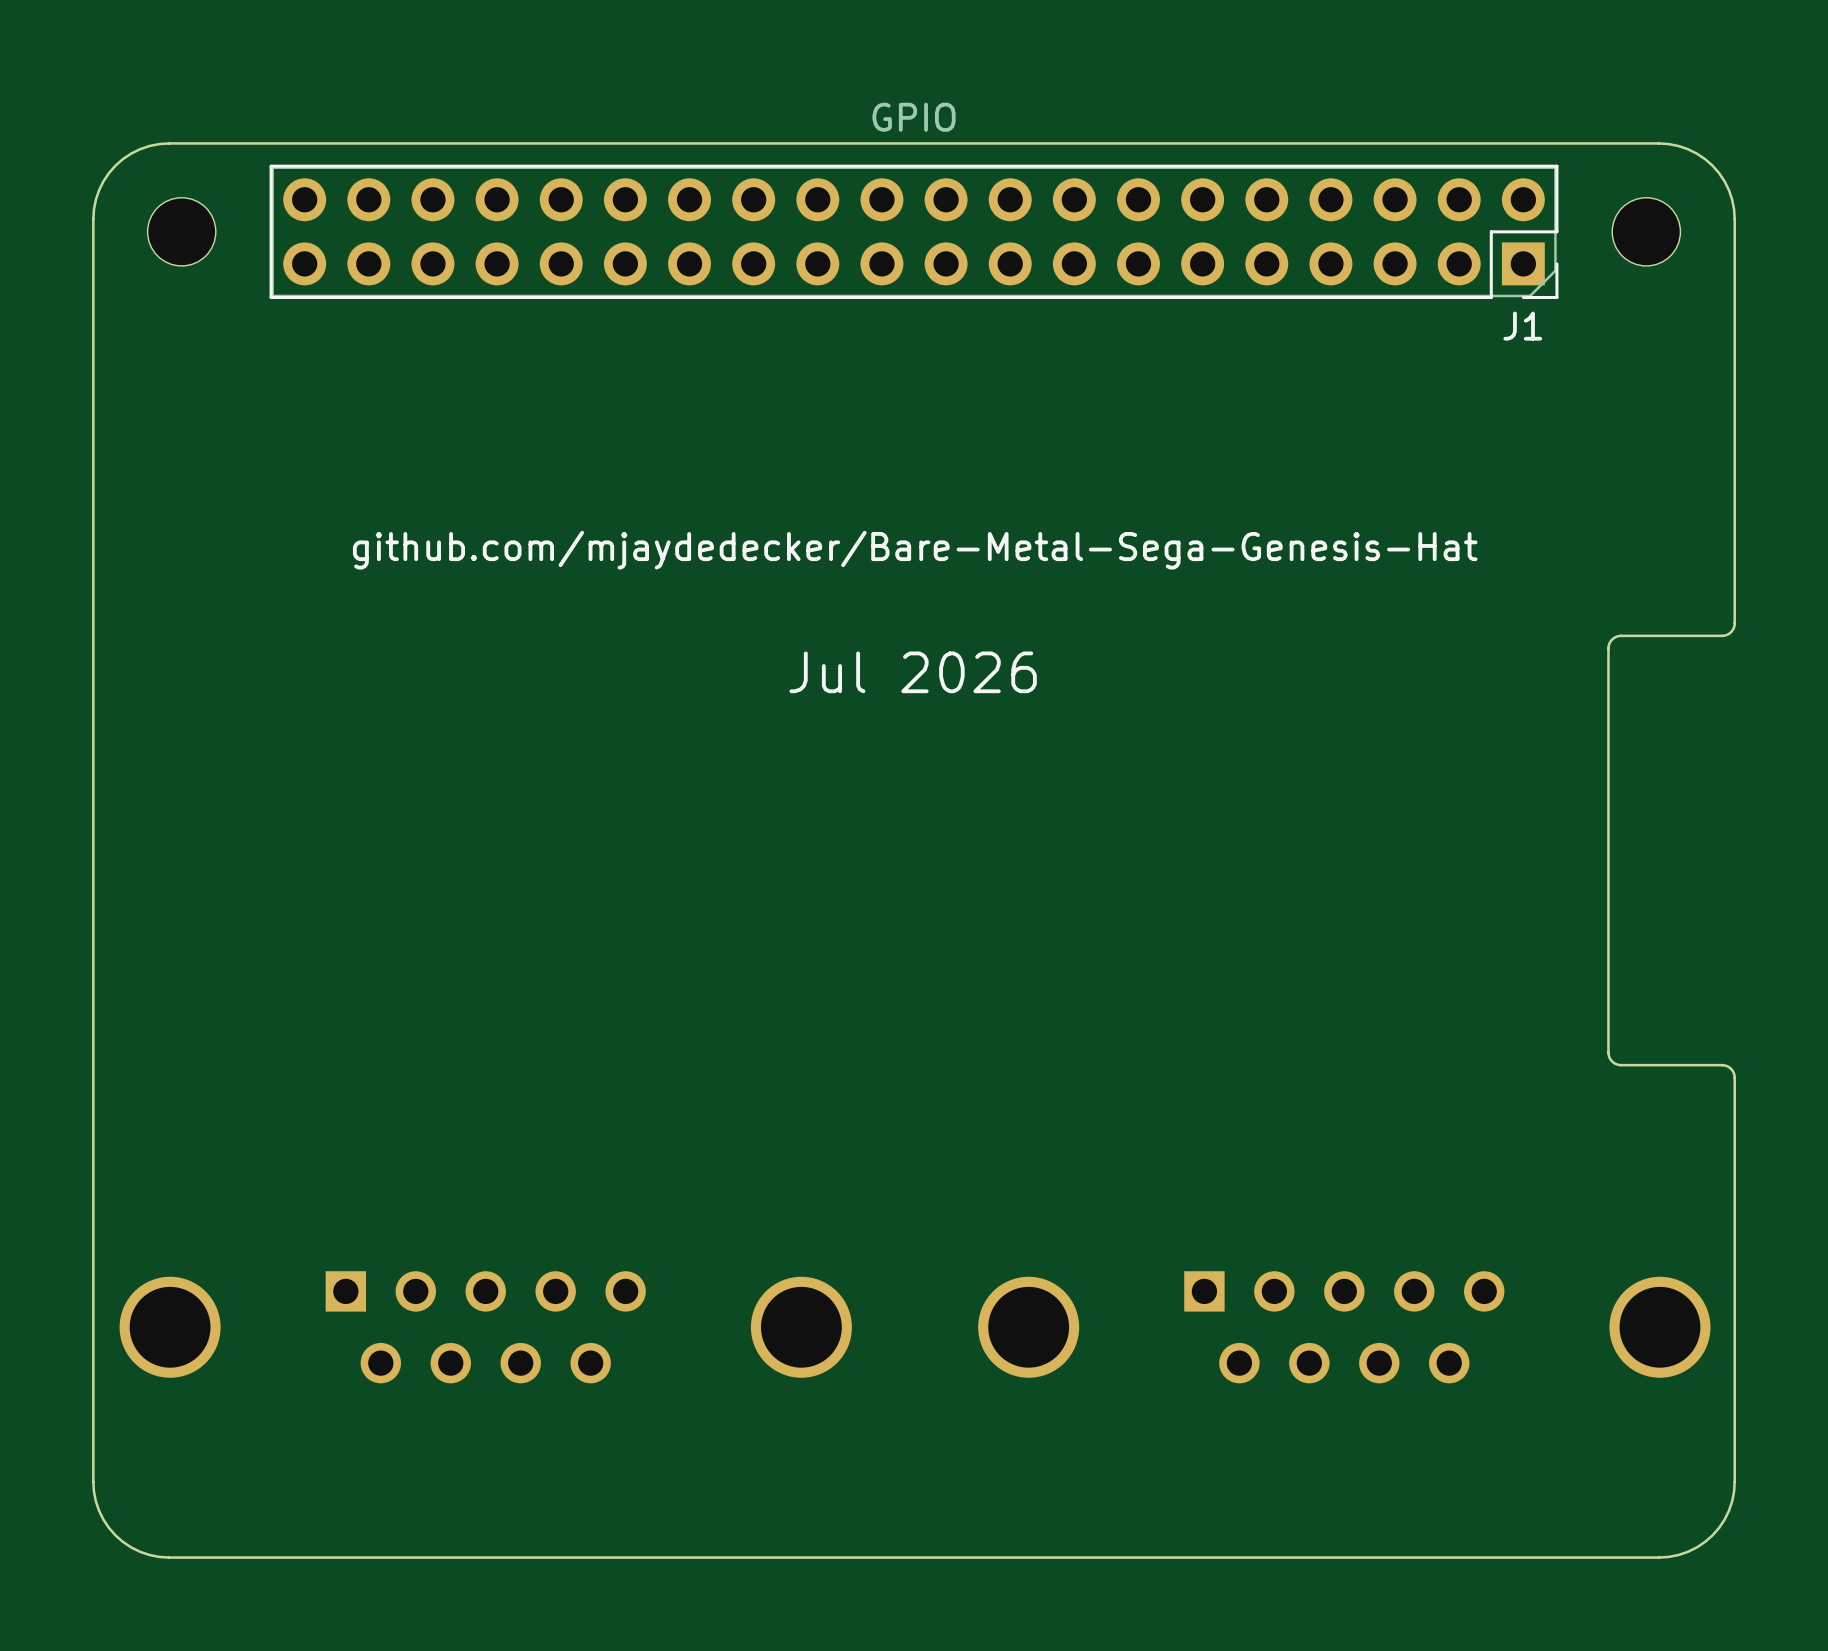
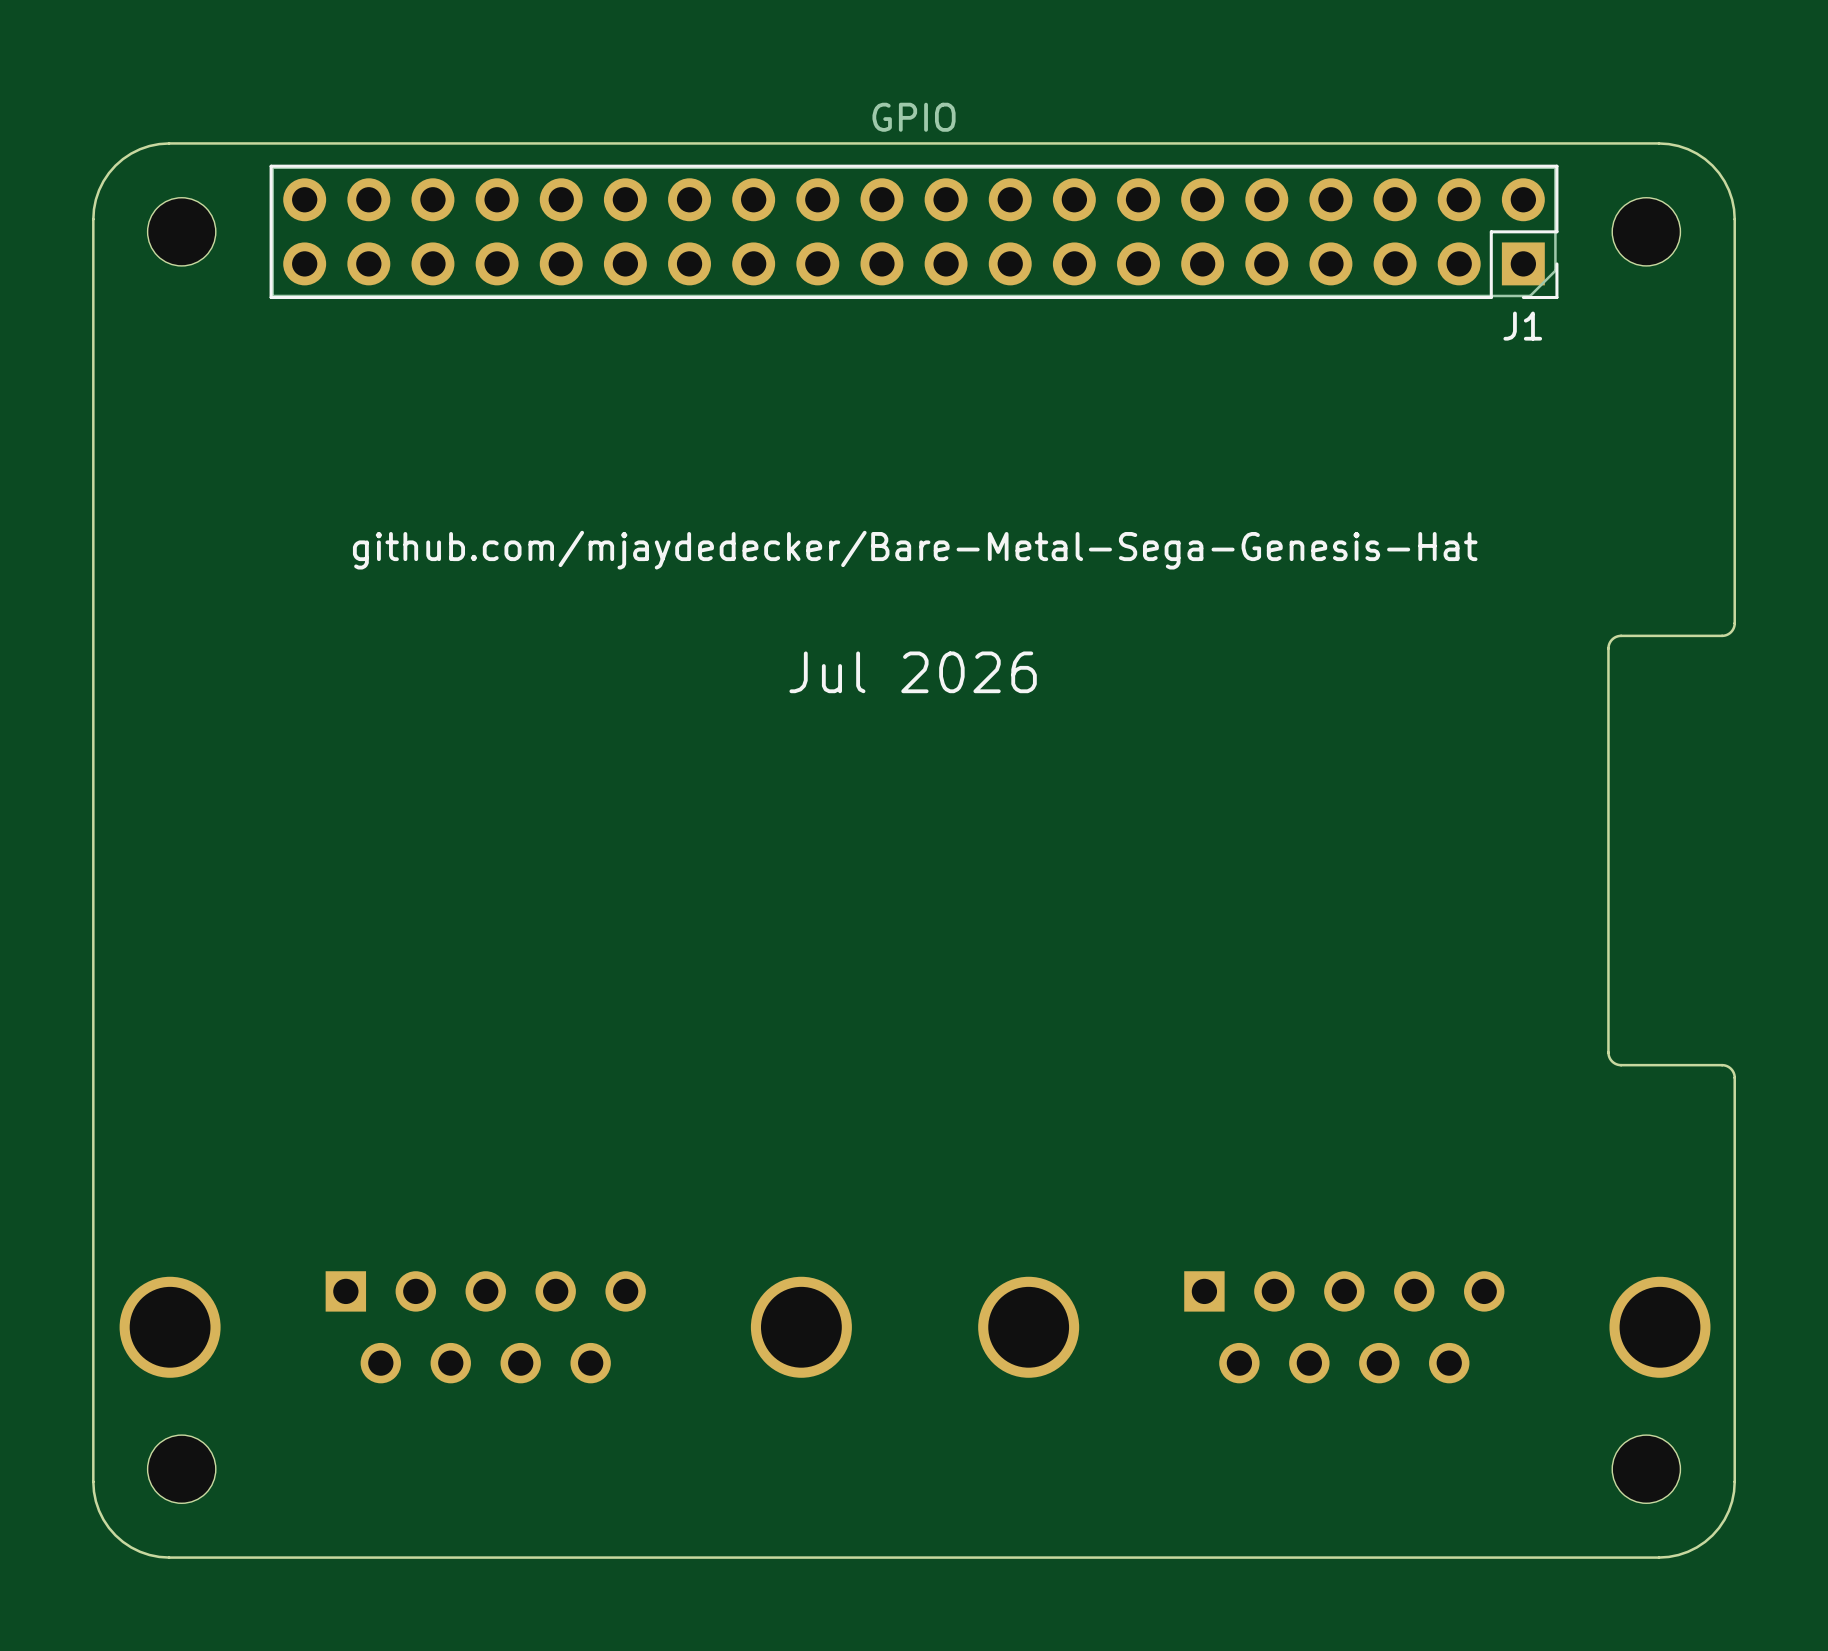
part: none -> (181, 1469)
part: none -> (1646, 1469)

